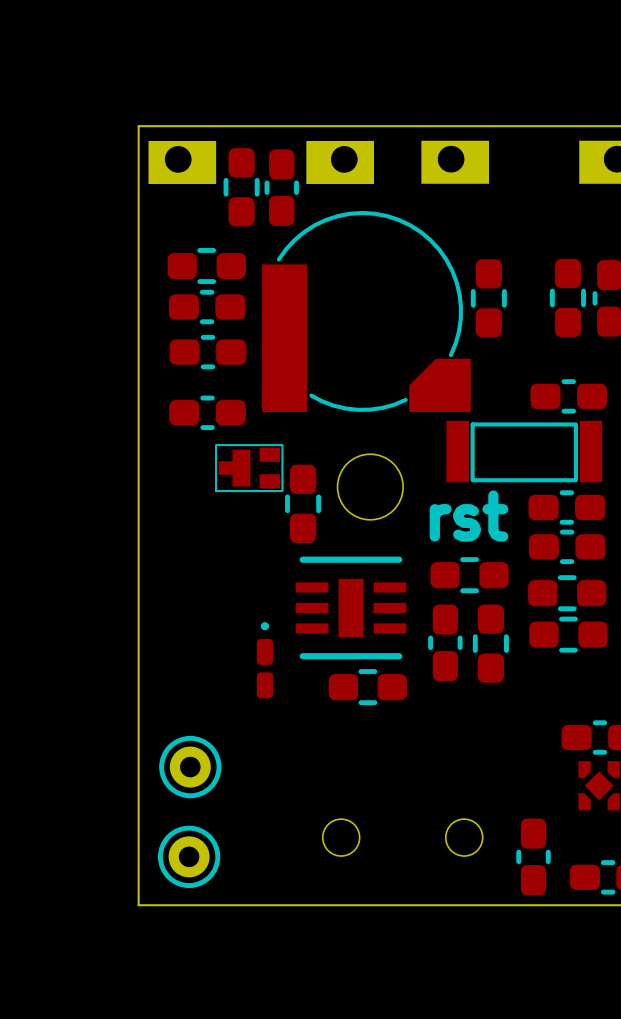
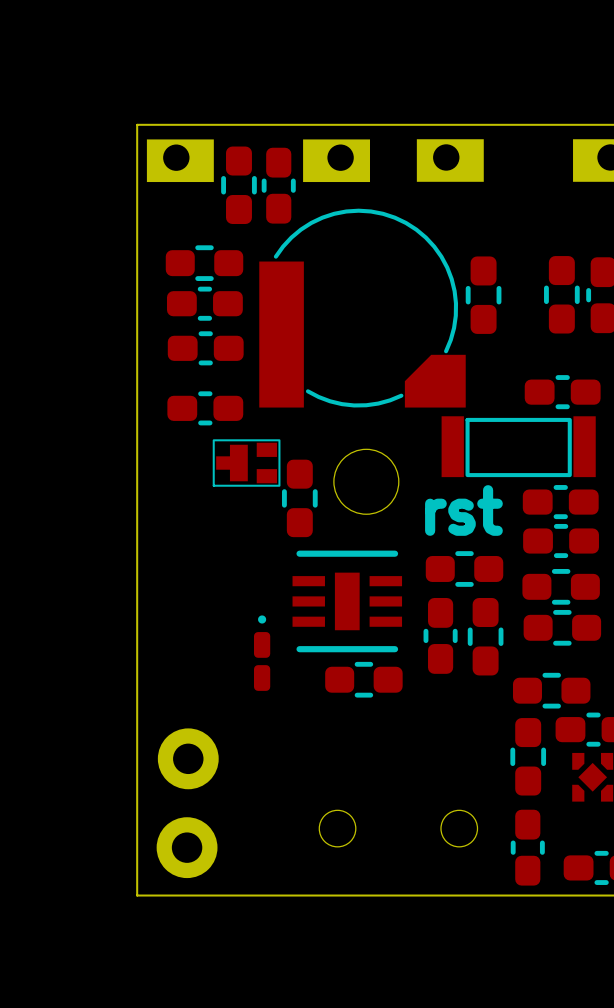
part: none -> (551, 690)
part footprint: [159, 735, 222, 799] -> [157, 728, 219, 790]
part: none -> (528, 756)
part footprint: [157, 825, 221, 889] -> [156, 817, 218, 879]

